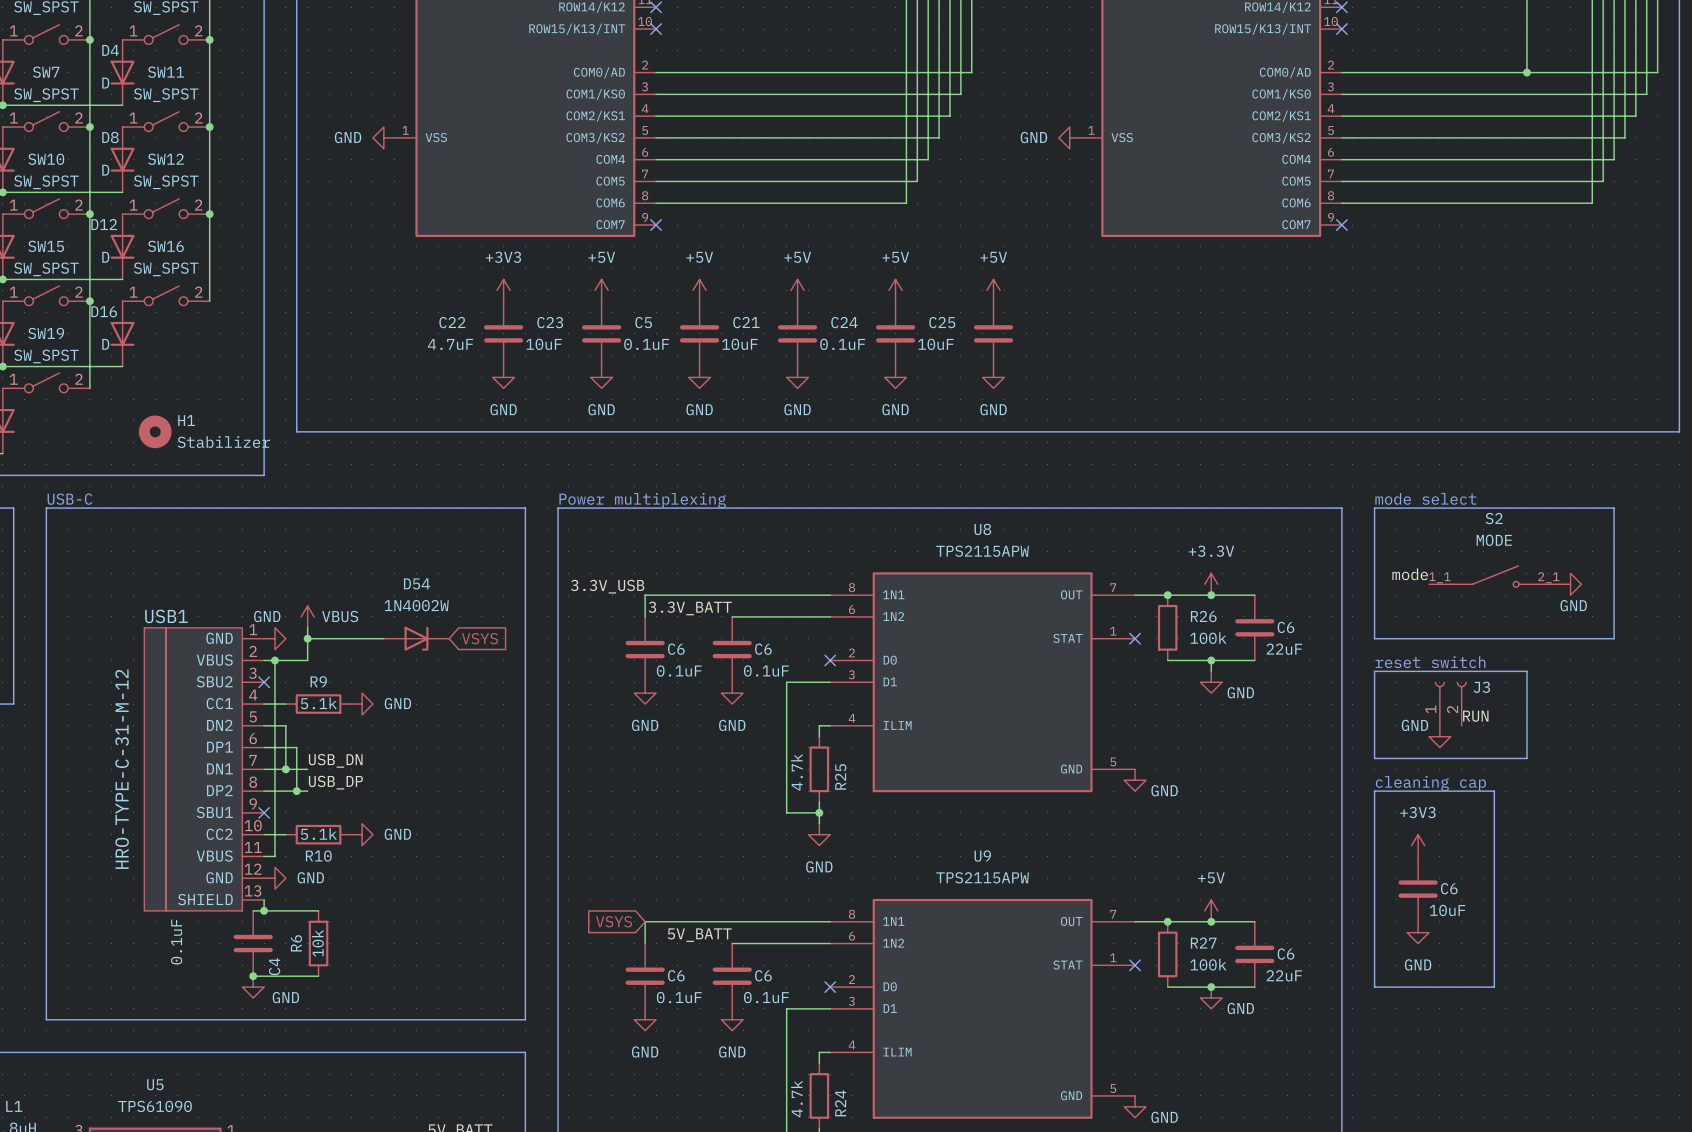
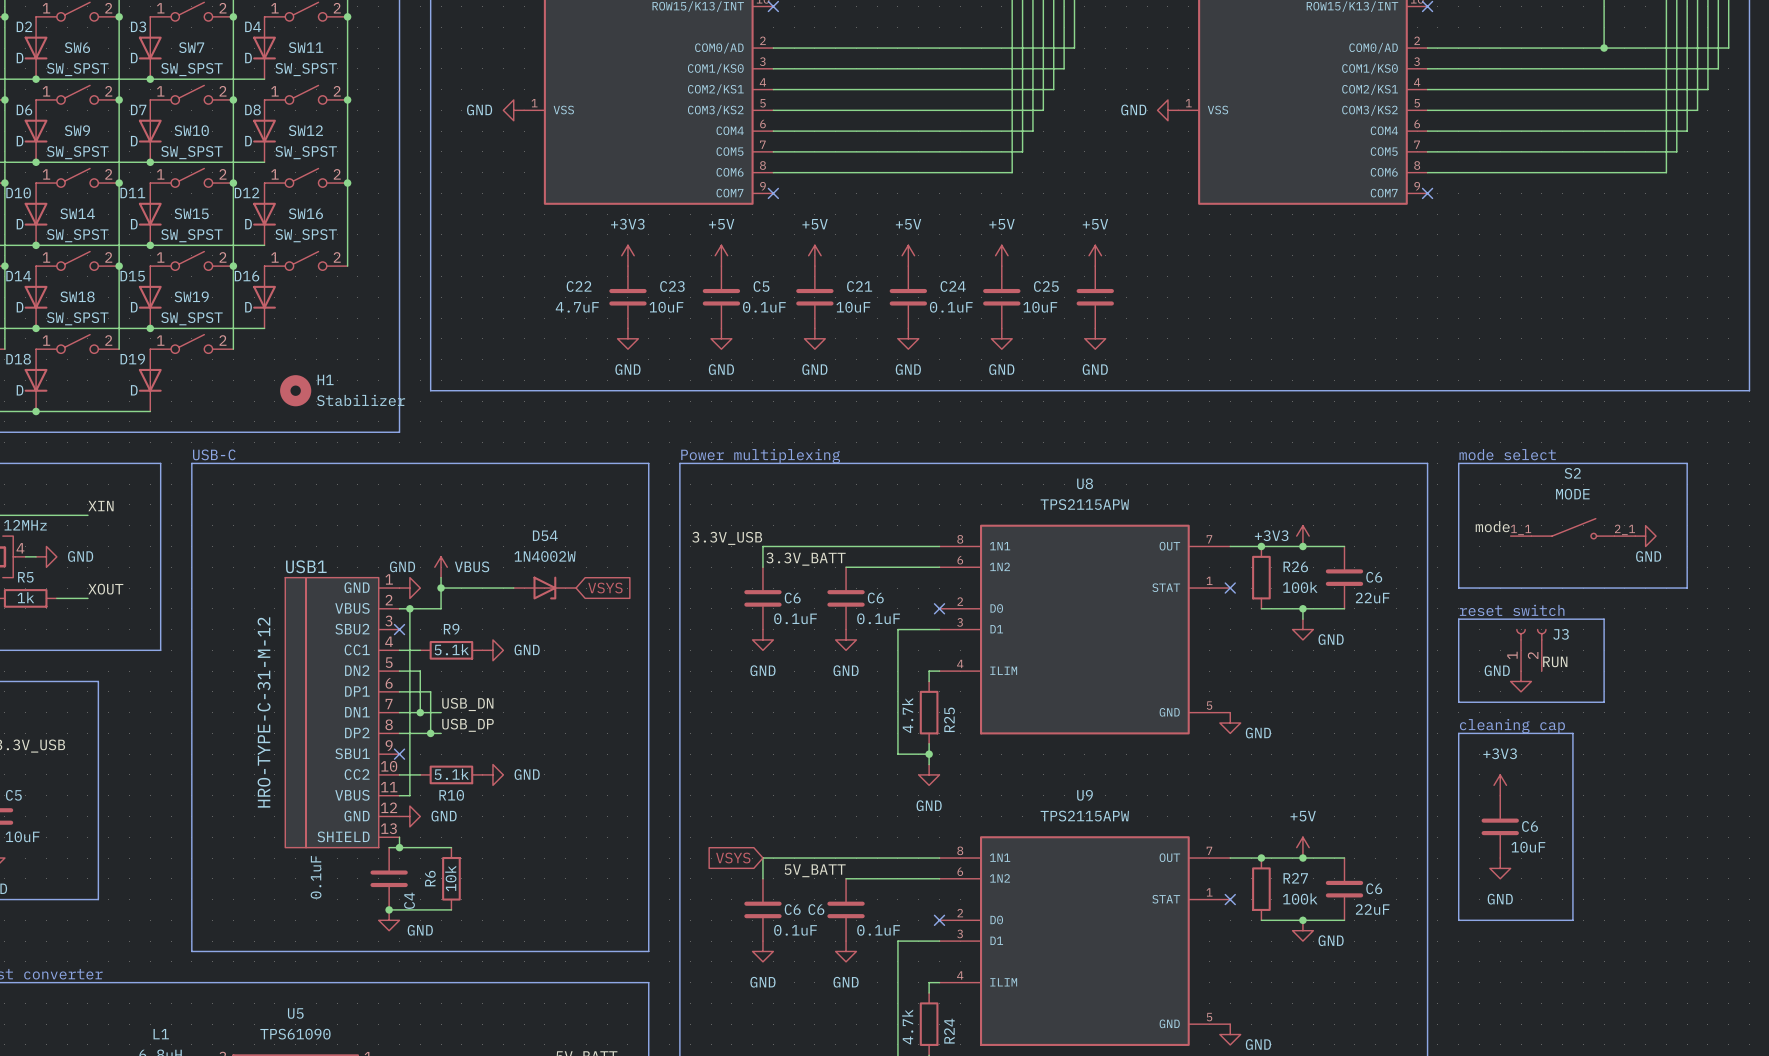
power symbol: +3.3V (1211, 584) -> +3V3 (1302, 536)
C6 name position: C6 (763, 975) -> C6 (816, 909)

